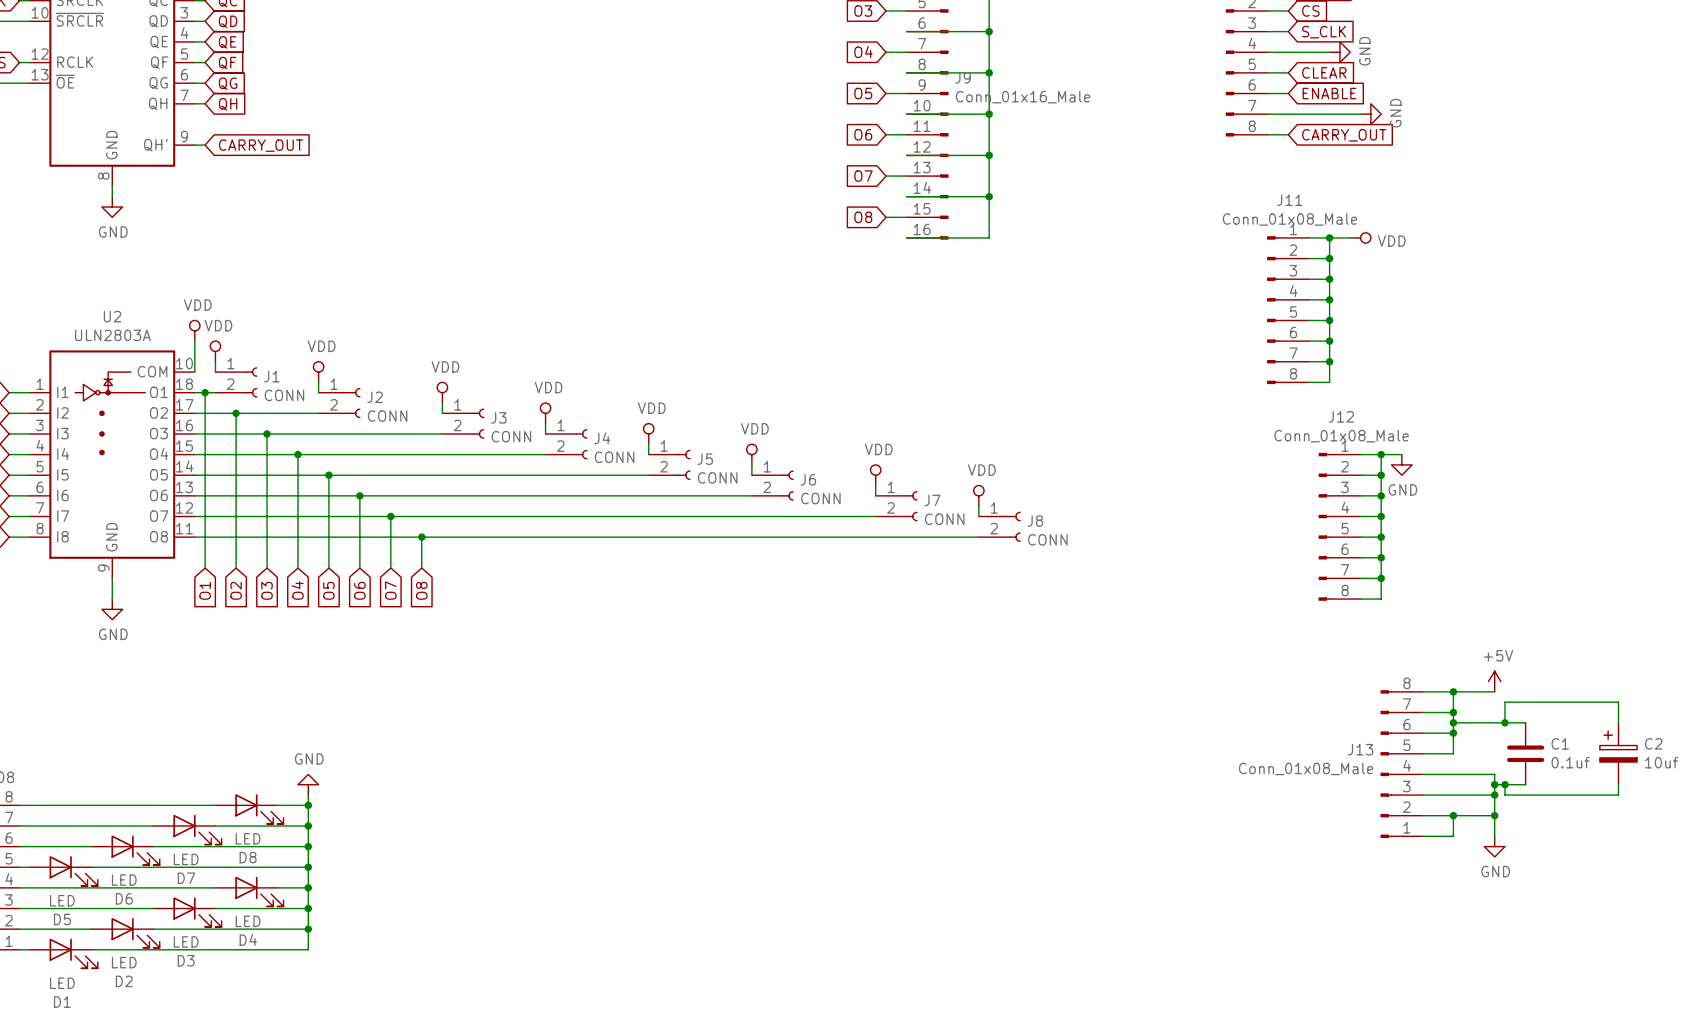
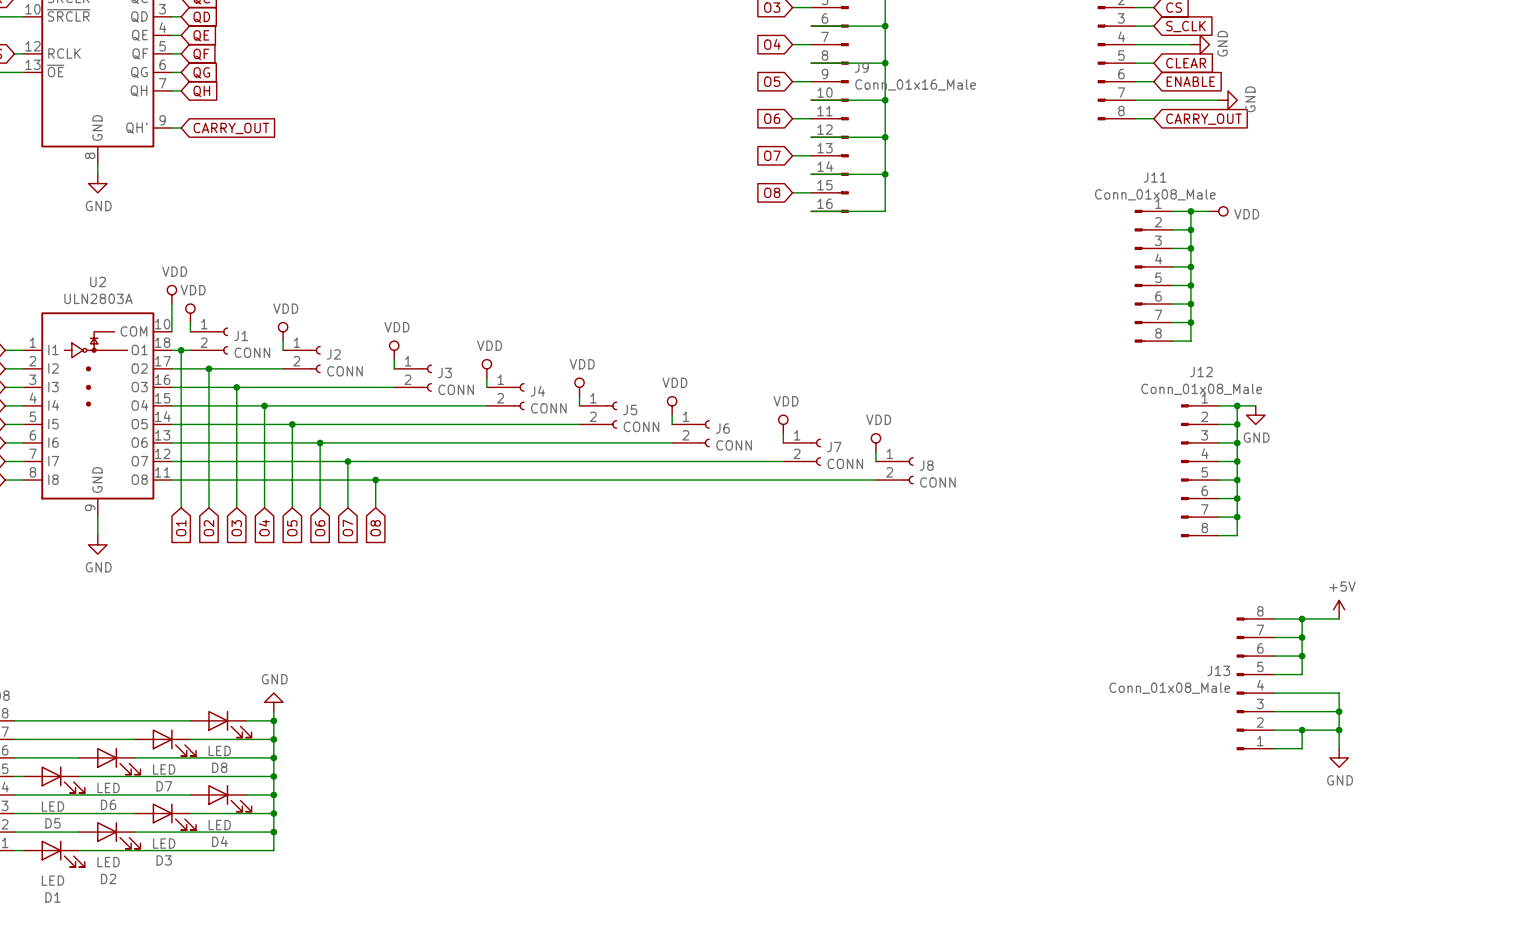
wire: (1453, 722) (1525, 722) -> none
junction: (1453, 722) -> none
wire: (1504, 722) (1504, 702) (1618, 702) (1618, 722) -> none
junction: (1504, 722) -> none
C1: 0.1uf (1525, 753) -> none
C2: 10uf (1618, 753) -> none
wire: (1494, 784) (1525, 784) -> none
junction: (1494, 784) -> none
wire: (1504, 784) (1504, 795) (1618, 795) (1618, 784) -> none
junction: (1504, 784) -> none

